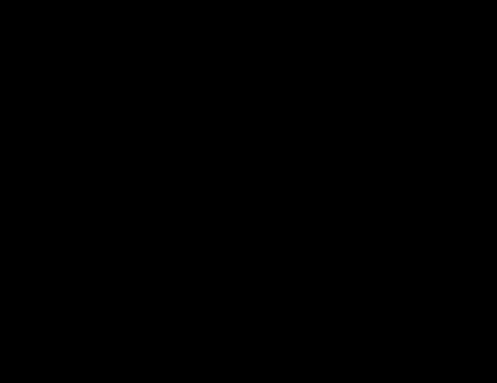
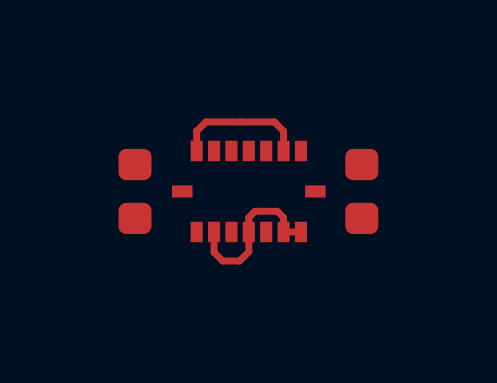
top track: none -> (283, 150) (283, 131) (274, 121) (205, 121) (196, 131) (196, 150)
part: none -> (134, 191)
part: none -> (248, 191)
part: none -> (361, 191)
top track: none -> (300, 231) (283, 231) (283, 217) (277, 211) (255, 211) (248, 217) (248, 251) (239, 260) (222, 260) (214, 252) (214, 231)

